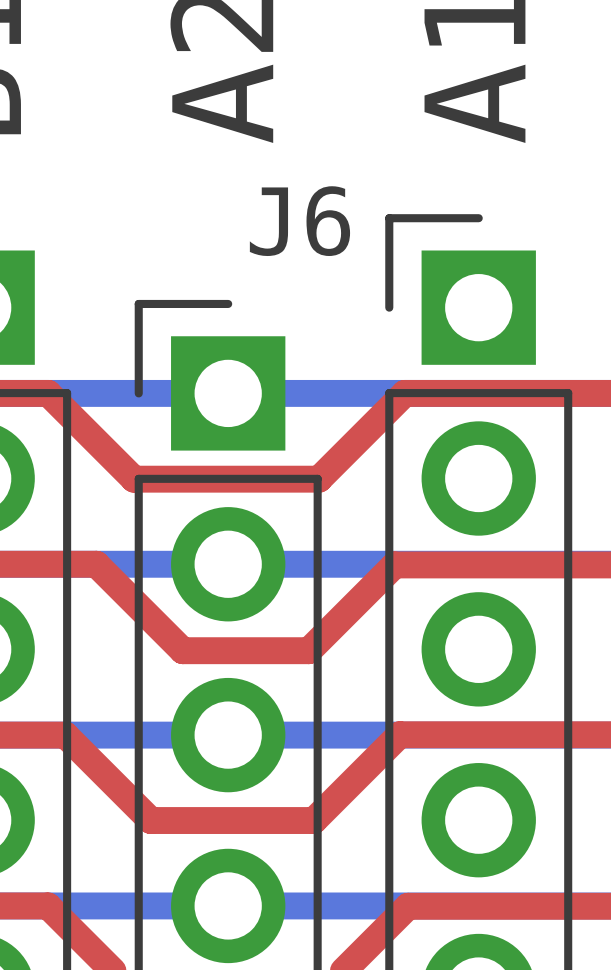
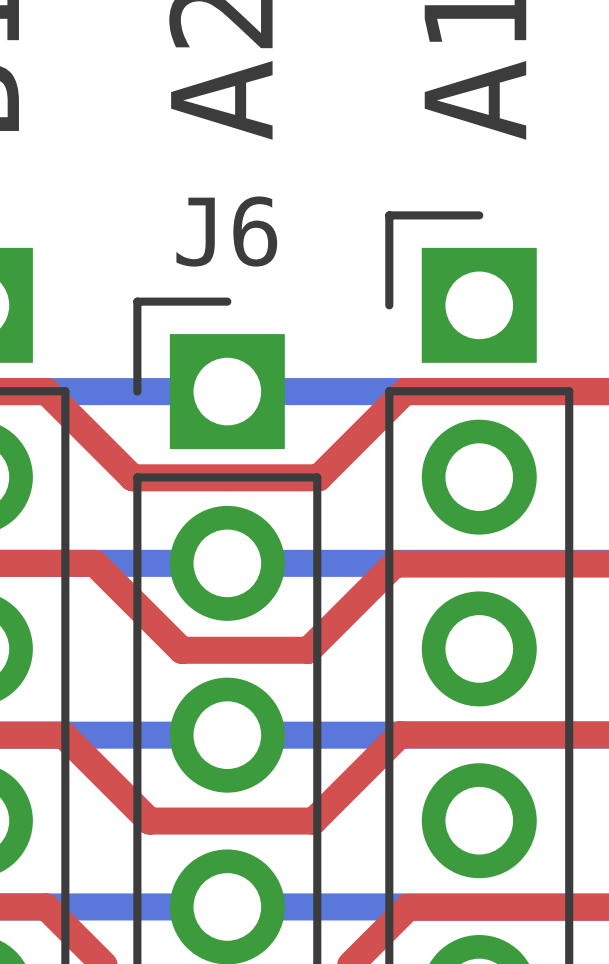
J6 name position: J6 (299, 221) -> J6 (226, 231)

